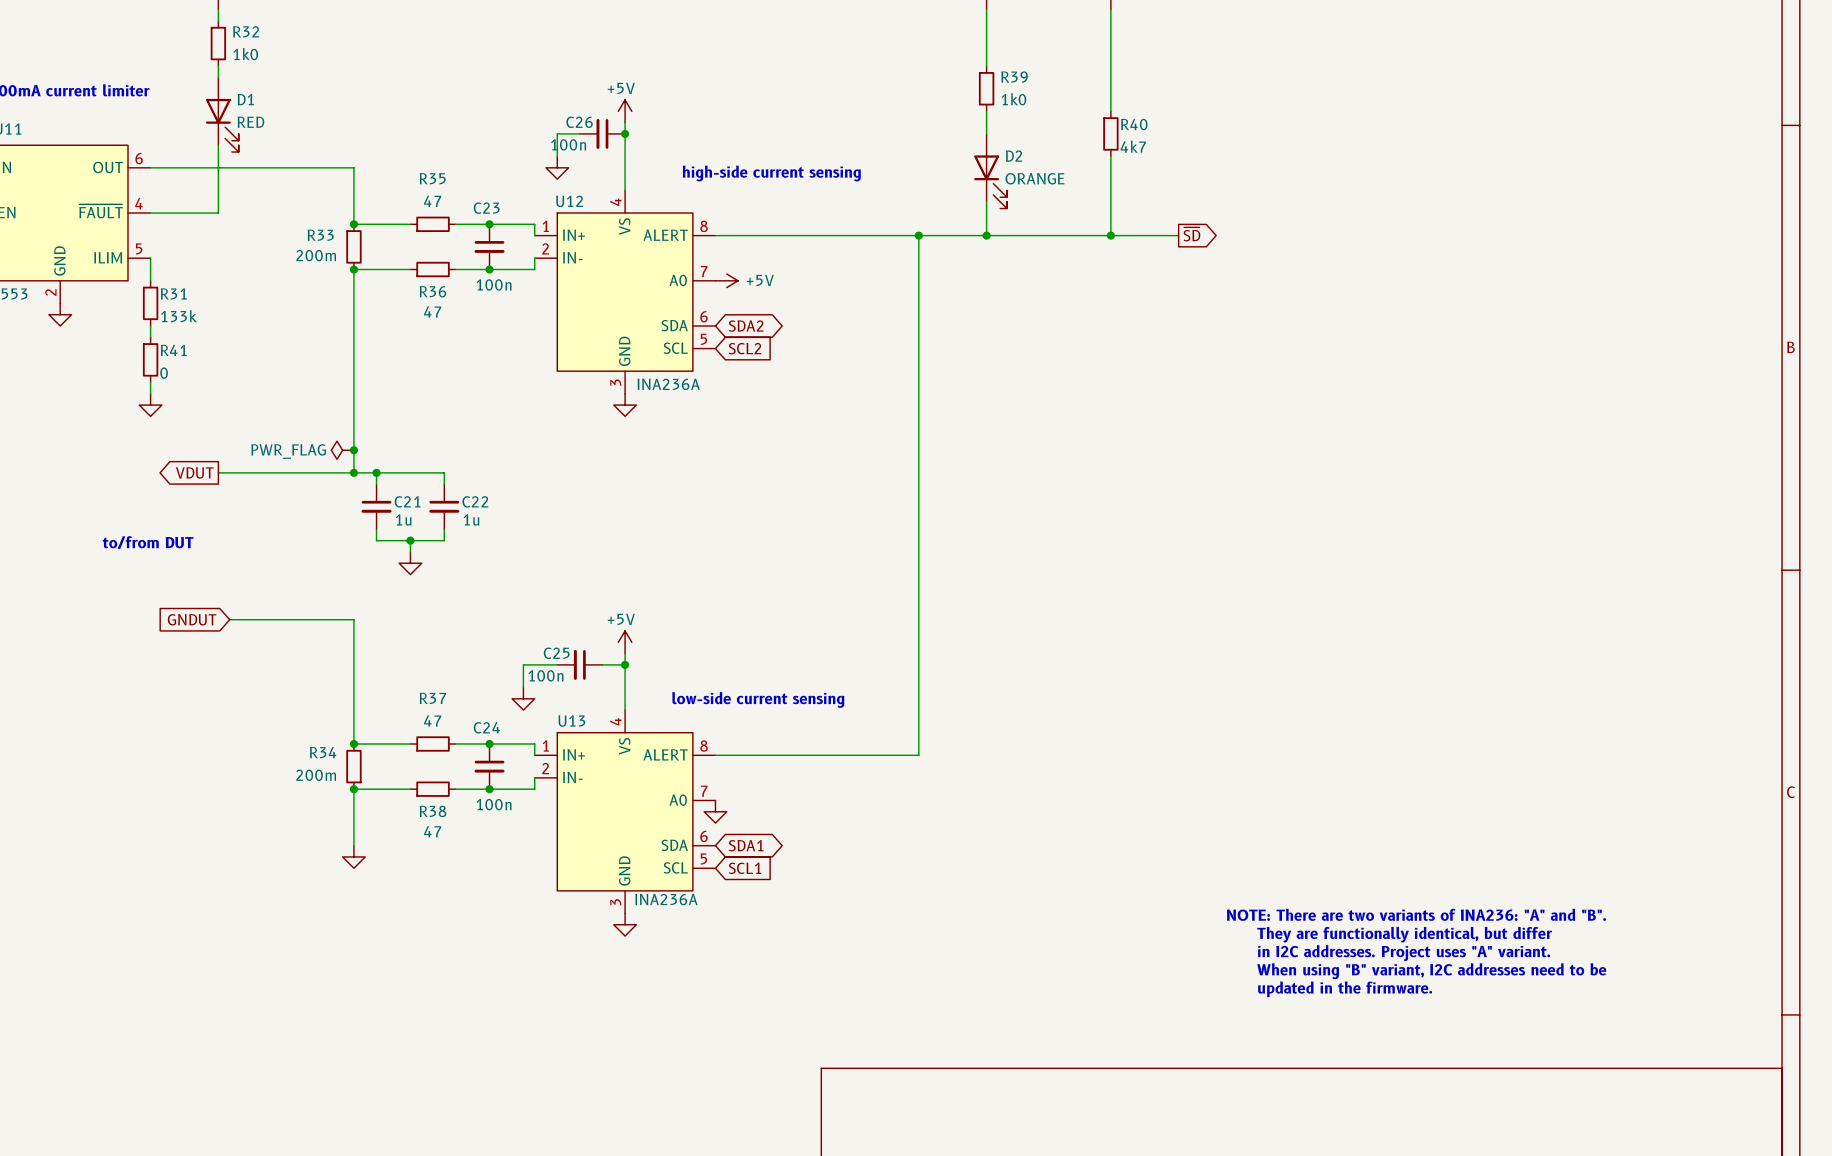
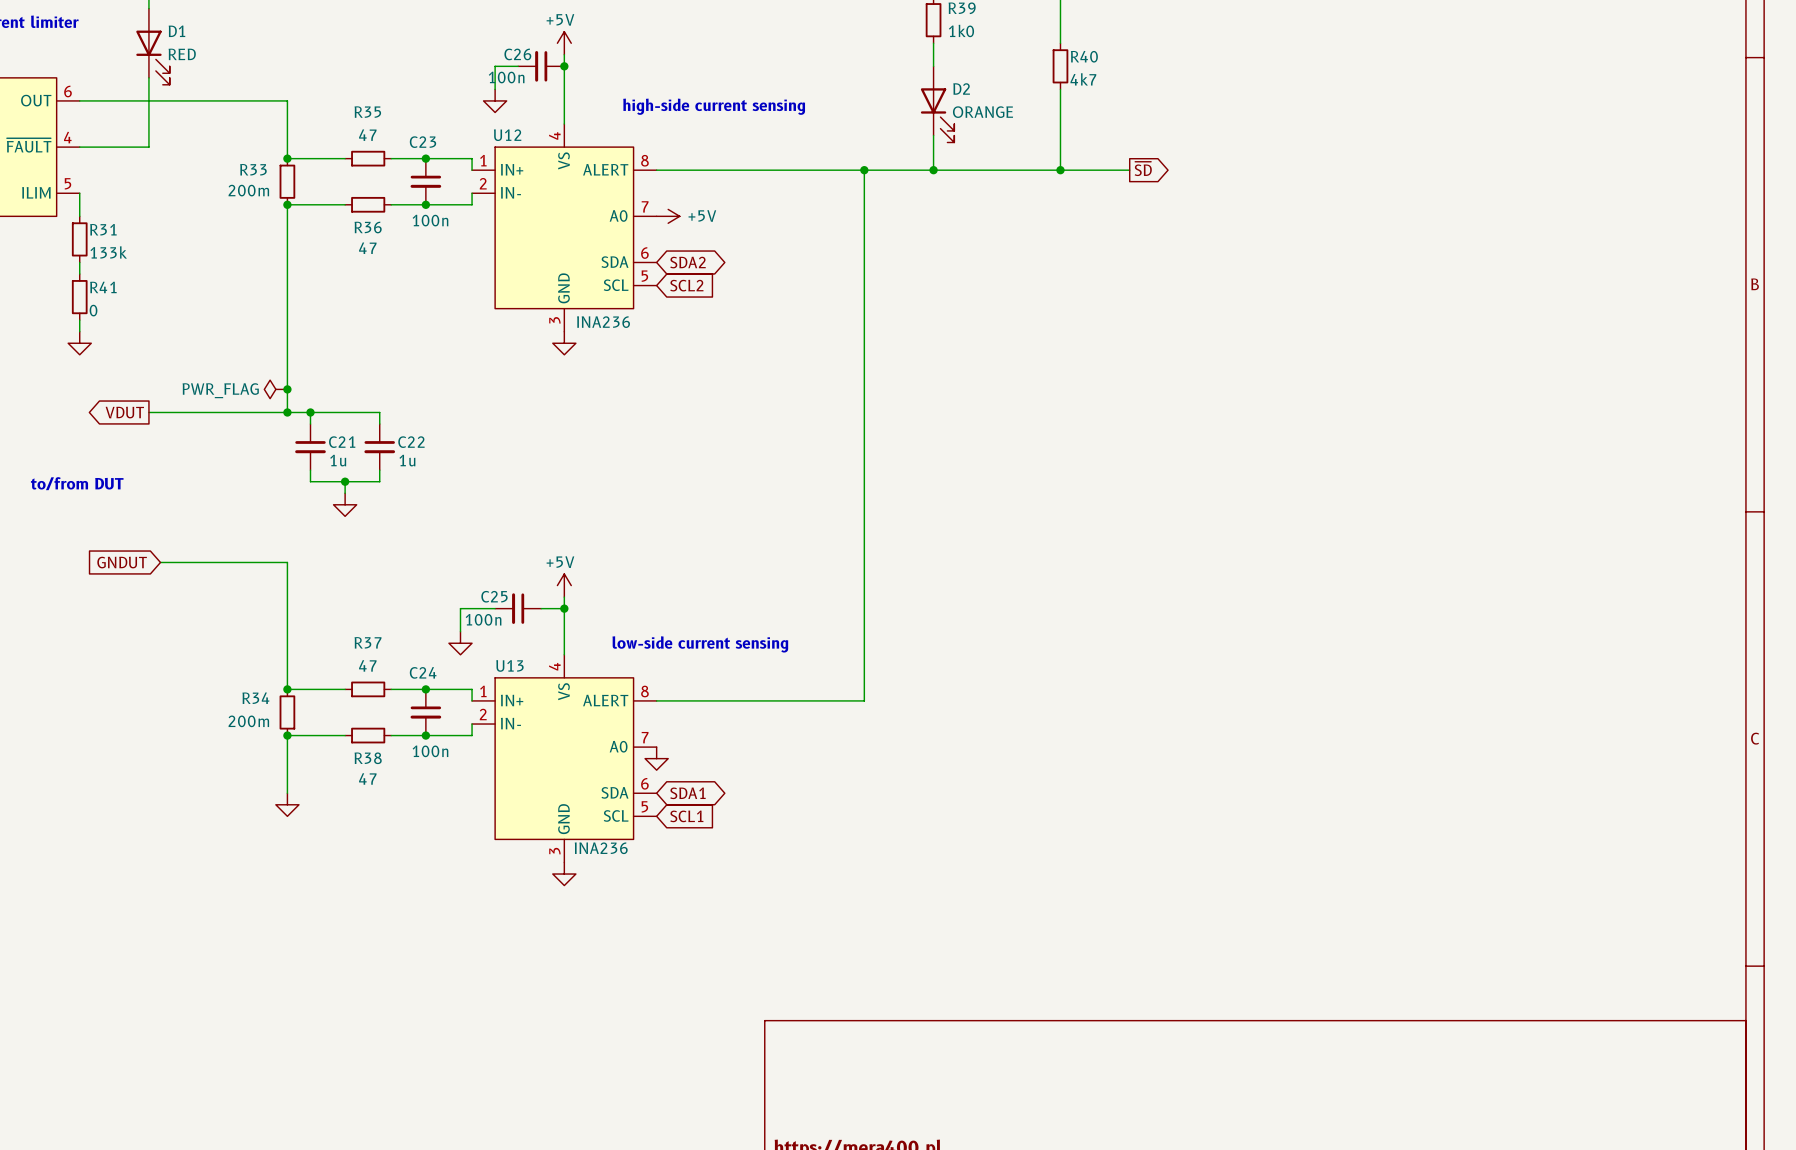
U12 value: INA236A (668, 384) -> INA236 (603, 322)
U13 value: INA236A (666, 899) -> INA236 (601, 848)
text: NOTE: There are two variants of INA236: "A" and "B". (1416, 914) -> none
text: They are functionally identical, but differ (1404, 934) -> none
text: in I2C addresses. Project uses "A" variant. (1404, 953) -> none
text: When using "B" variant, I2C addresses need to be (1431, 971) -> none
text: updated in the firmware. (1345, 989) -> none

